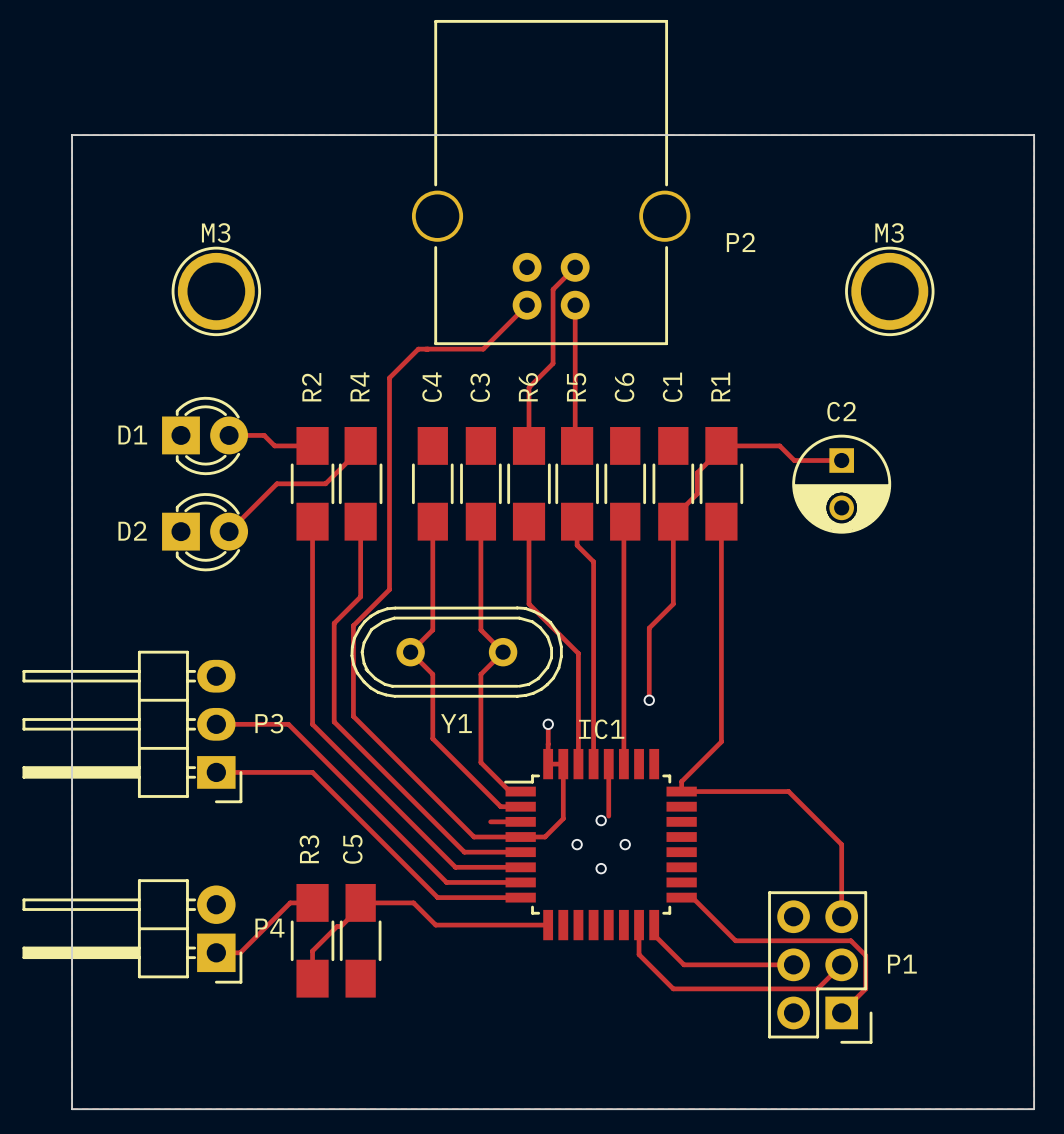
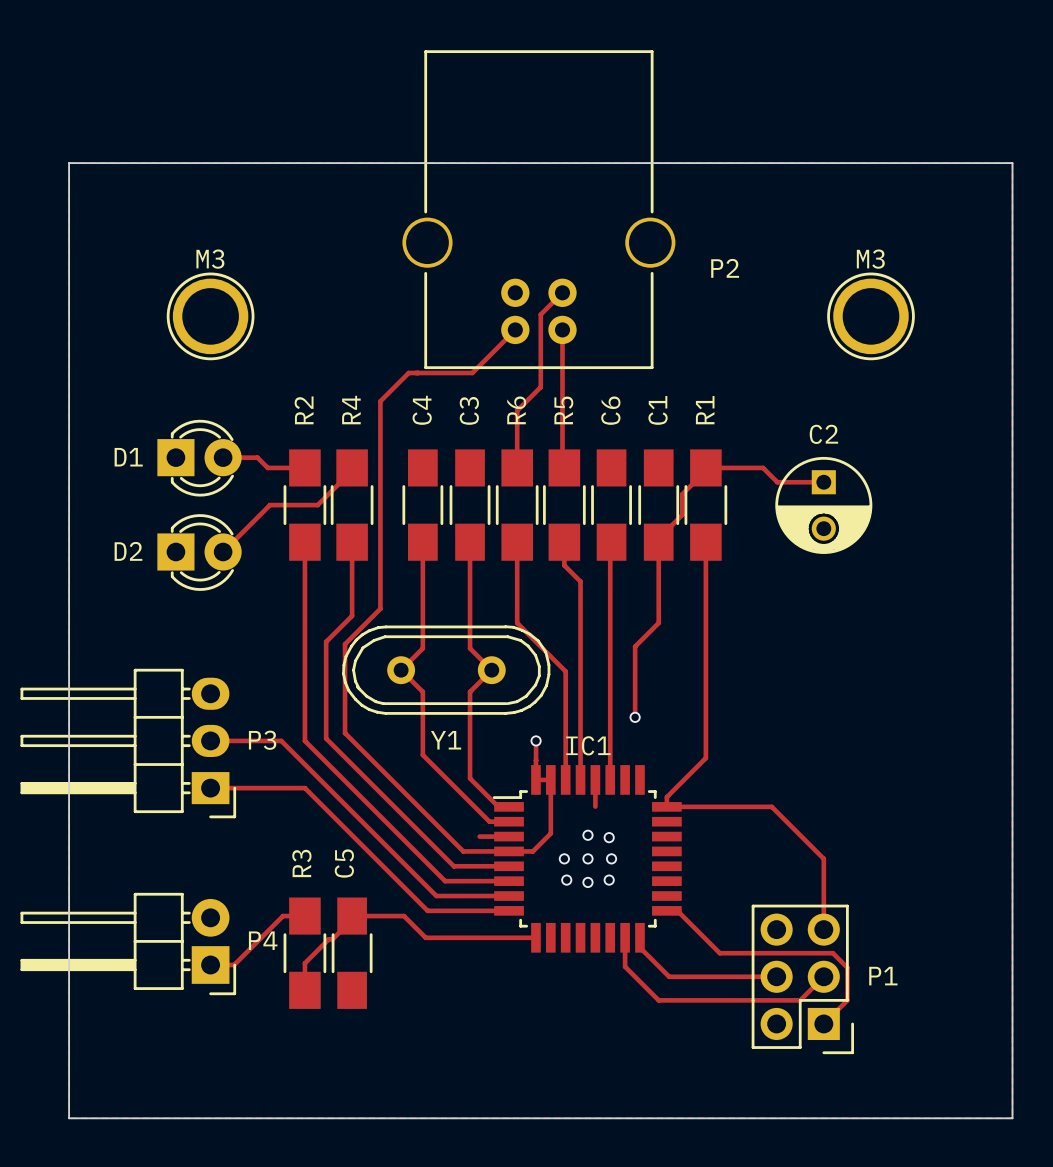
track: (608, 791) (608, 816) -> none
via: none -> (609, 837)
via: none -> (587, 858)
via: none -> (566, 880)
via: none -> (609, 880)

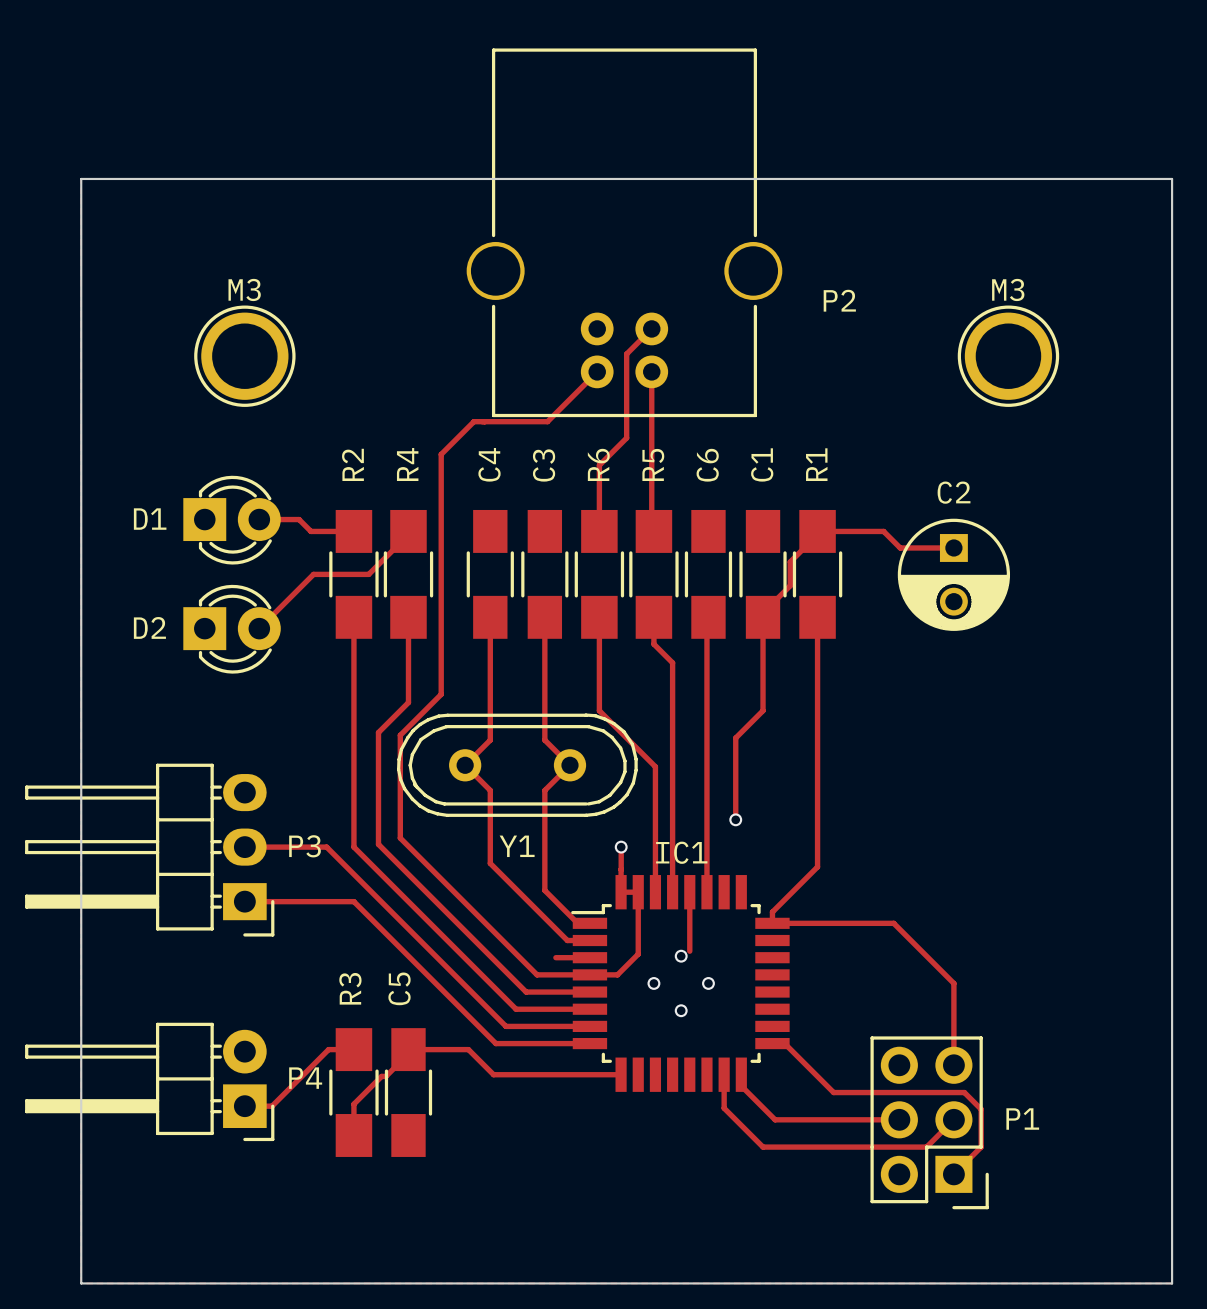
track: none -> (689, 923) (689, 951)
via: (609, 837) -> none
via: (587, 858) -> none
via: (566, 880) -> none
via: (609, 880) -> none

